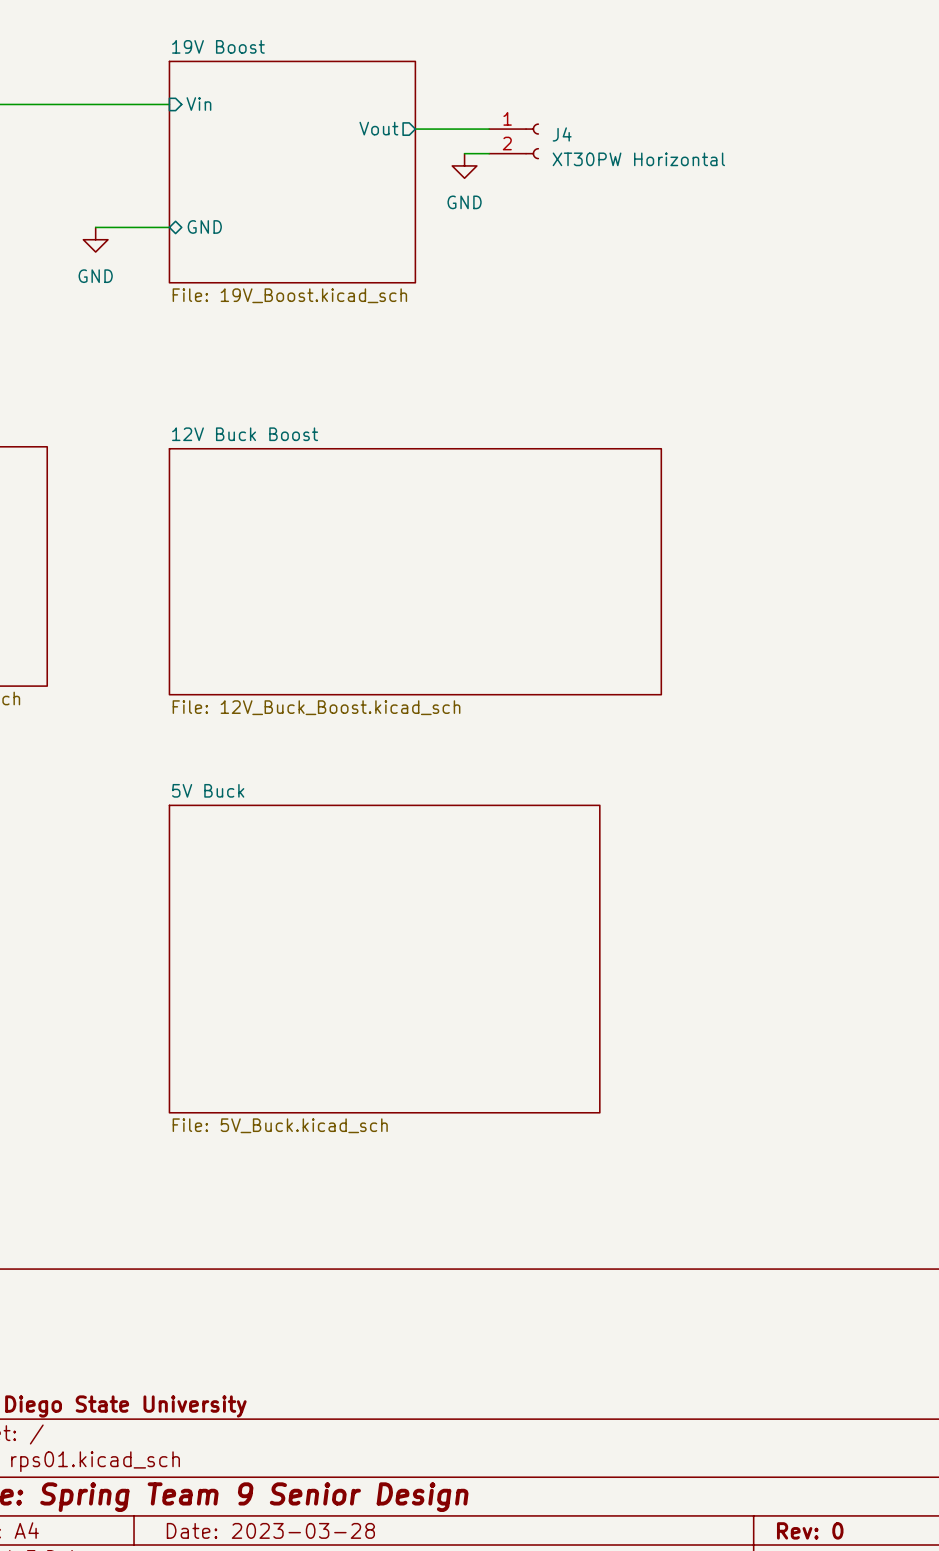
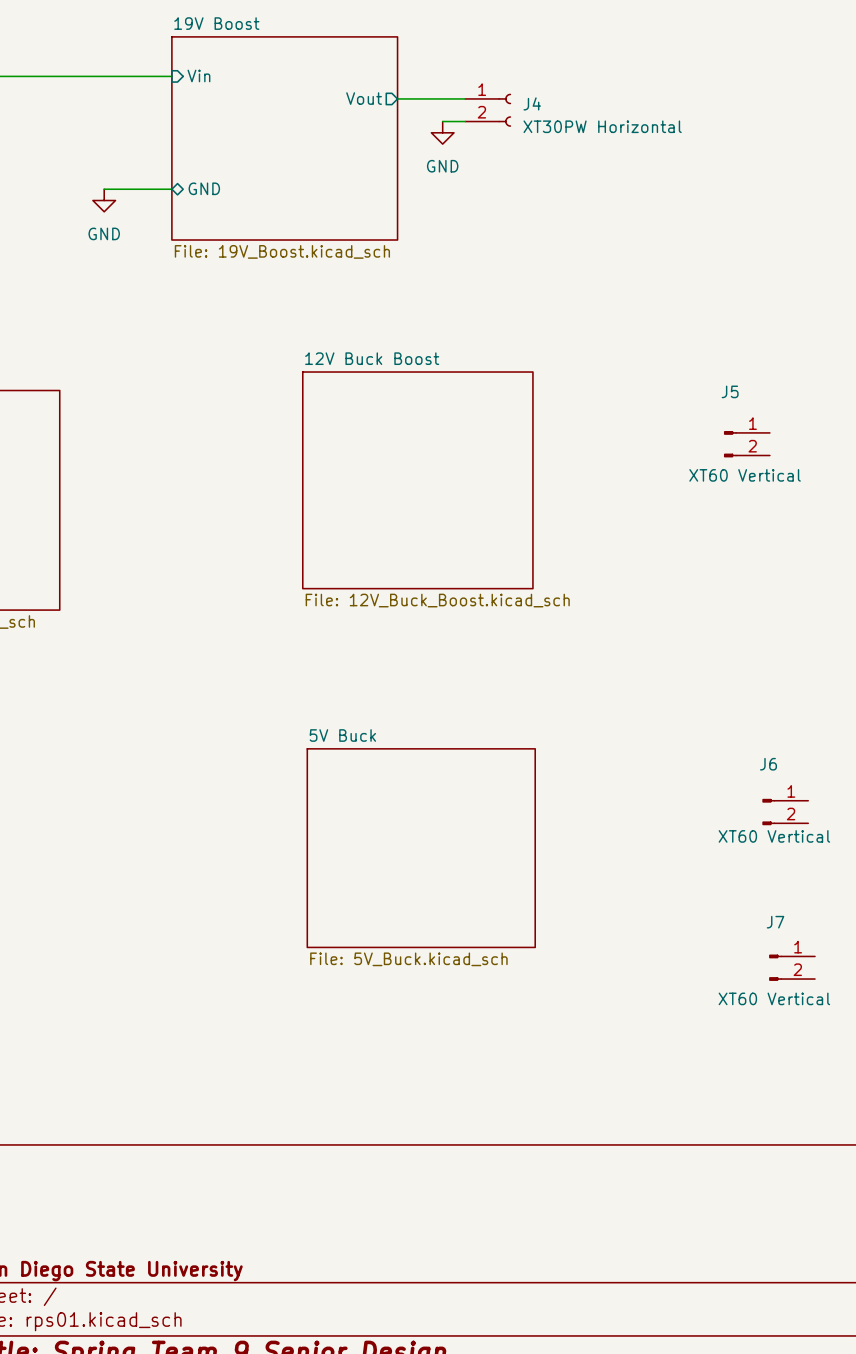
sheet 12V Buck Boost name position: 12V Buck Boost (245, 434) -> 12V Buck Boost (372, 358)
sheet 12V Buck Boost shape: [168, 448, 663, 696] -> [302, 371, 534, 590]
J5: none -> XT60 Vertical (746, 444)
sheet 12V Buck Boost value position: File: 12V_Buck_Boost.kicad_sch (316, 707) -> File: 12V_Buck_Boost.kicad_sch (437, 600)
sheet 5V Buck name position: 5V Buck (208, 790) -> 5V Buck (342, 735)
sheet 5V Buck shape: [168, 804, 601, 1114] -> [306, 748, 536, 949]
J6: none -> XT60 Vertical (785, 812)
J7: none -> XT60 Vertical (792, 967)
sheet 5V Buck value position: File: 5V_Buck.kicad_sch (280, 1125) -> File: 5V_Buck.kicad_sch (408, 959)

